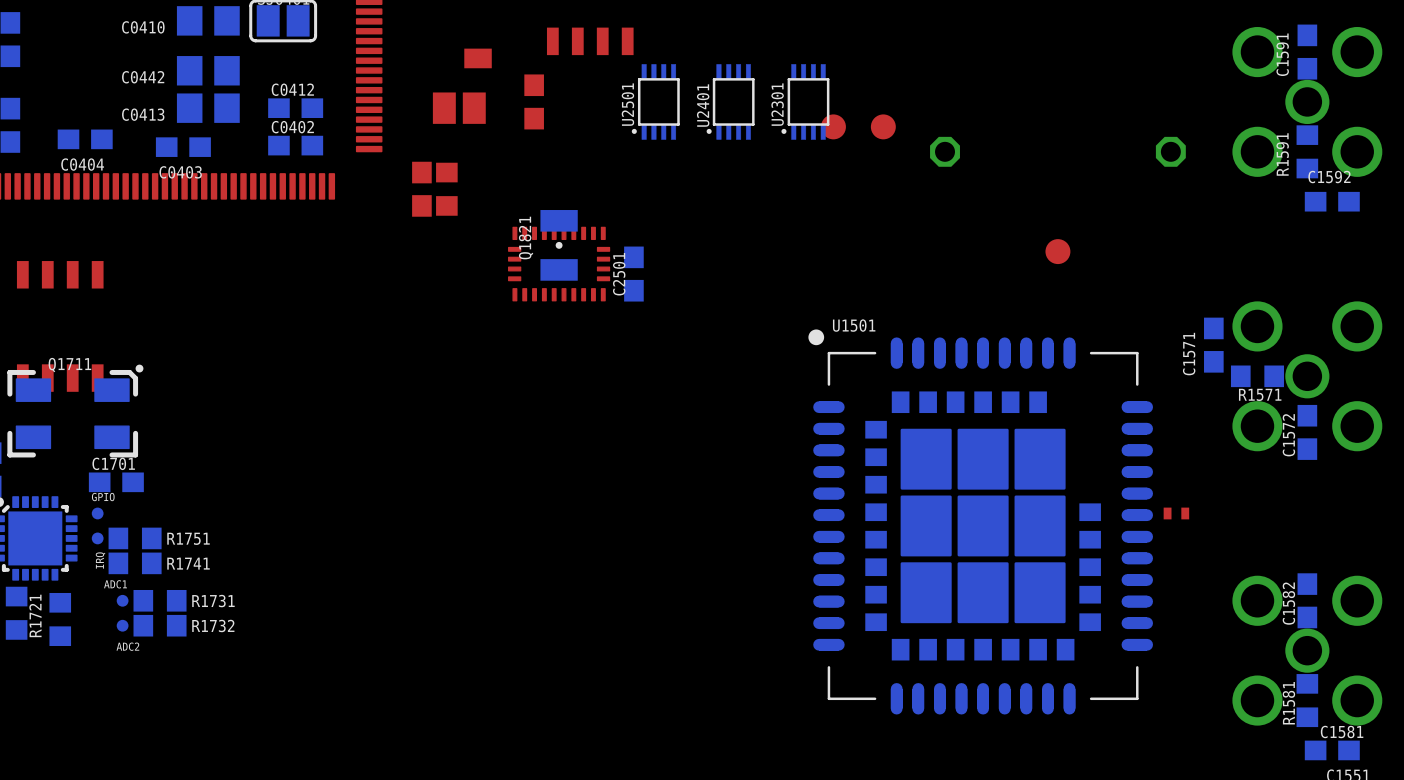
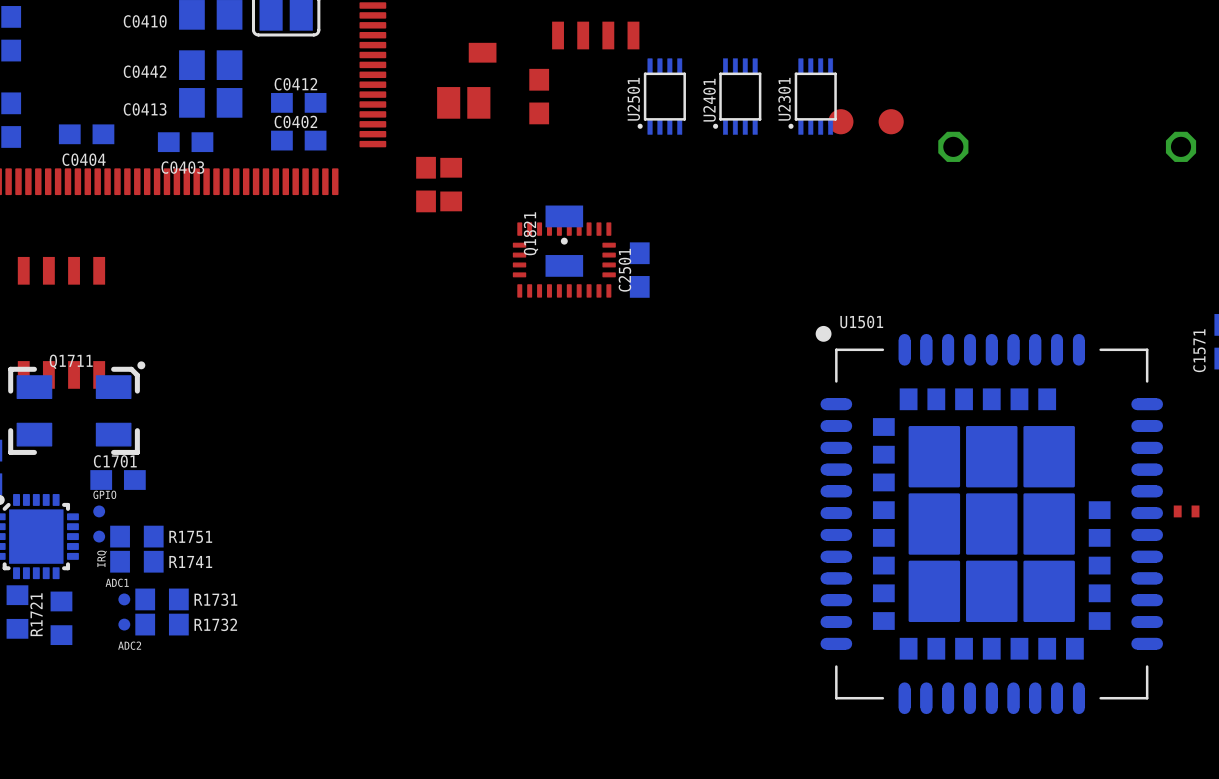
part: (1057, 251) -> none

